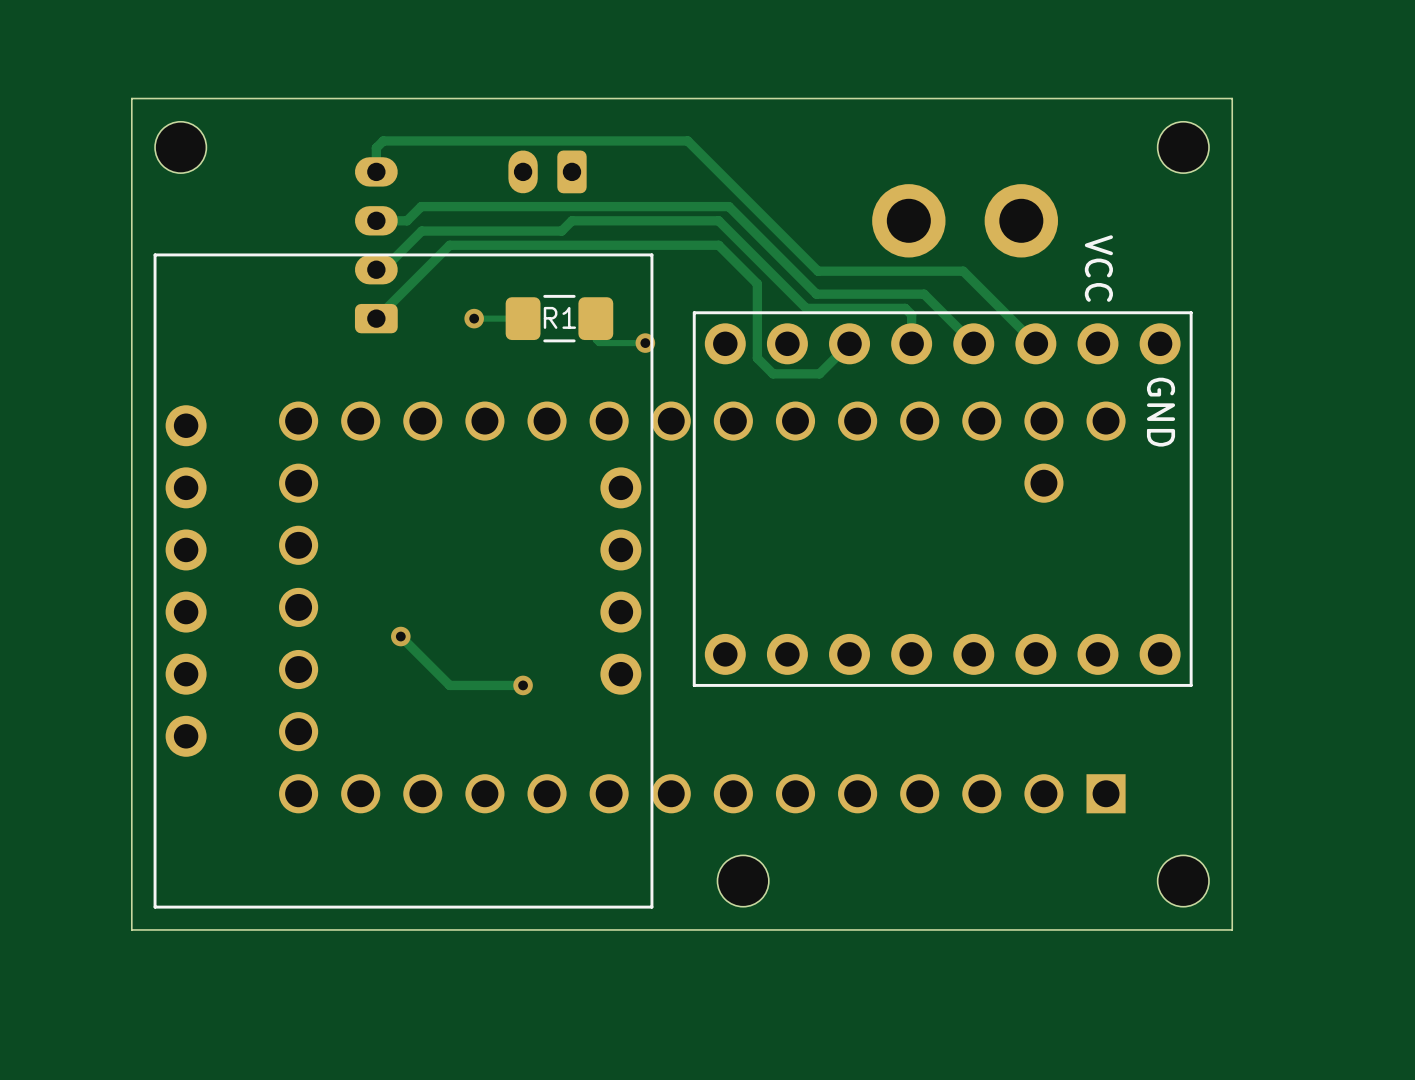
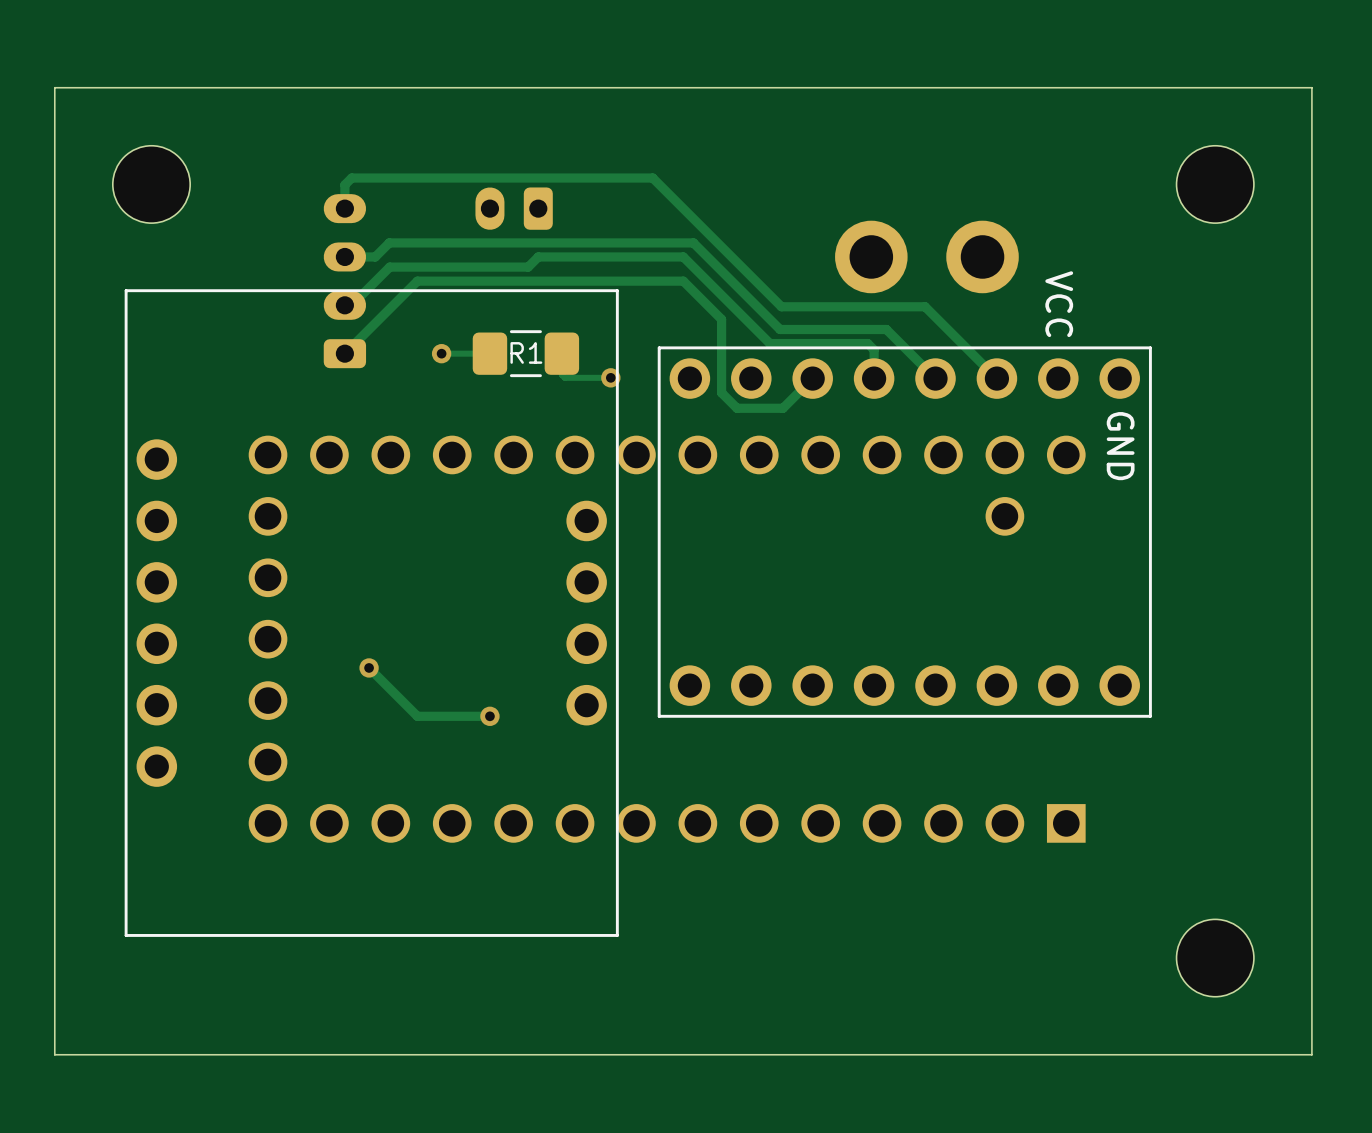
board edge: (1232, 98) (1232, 929) (131, 929) (131, 98) (1232, 98) -> (1311, 87) (1311, 1054) (54, 1054) (54, 87) (1311, 87)
part footprint: [155, 121, 207, 174] -> [112, 145, 191, 224]
part: (1183, 147) -> none
part: none -> (1215, 184)
part: (743, 881) -> none
part: (1183, 881) -> none
part: none -> (1215, 958)

